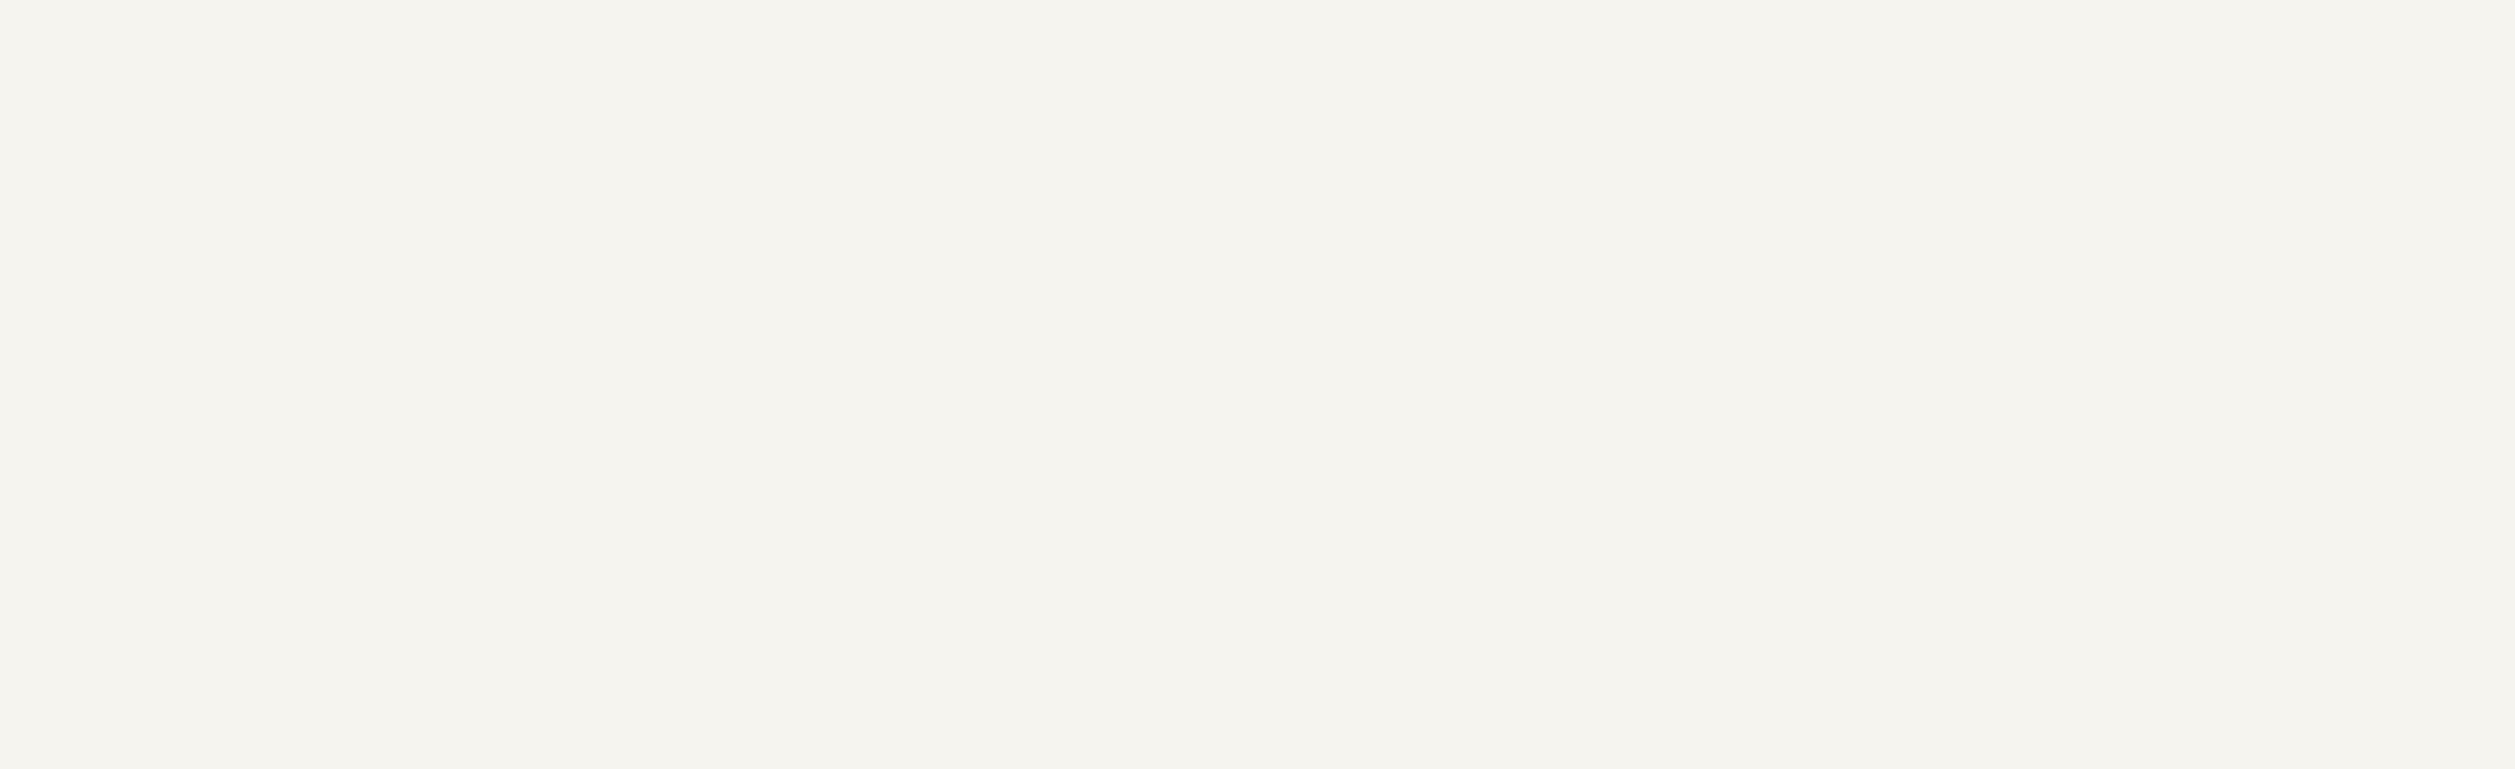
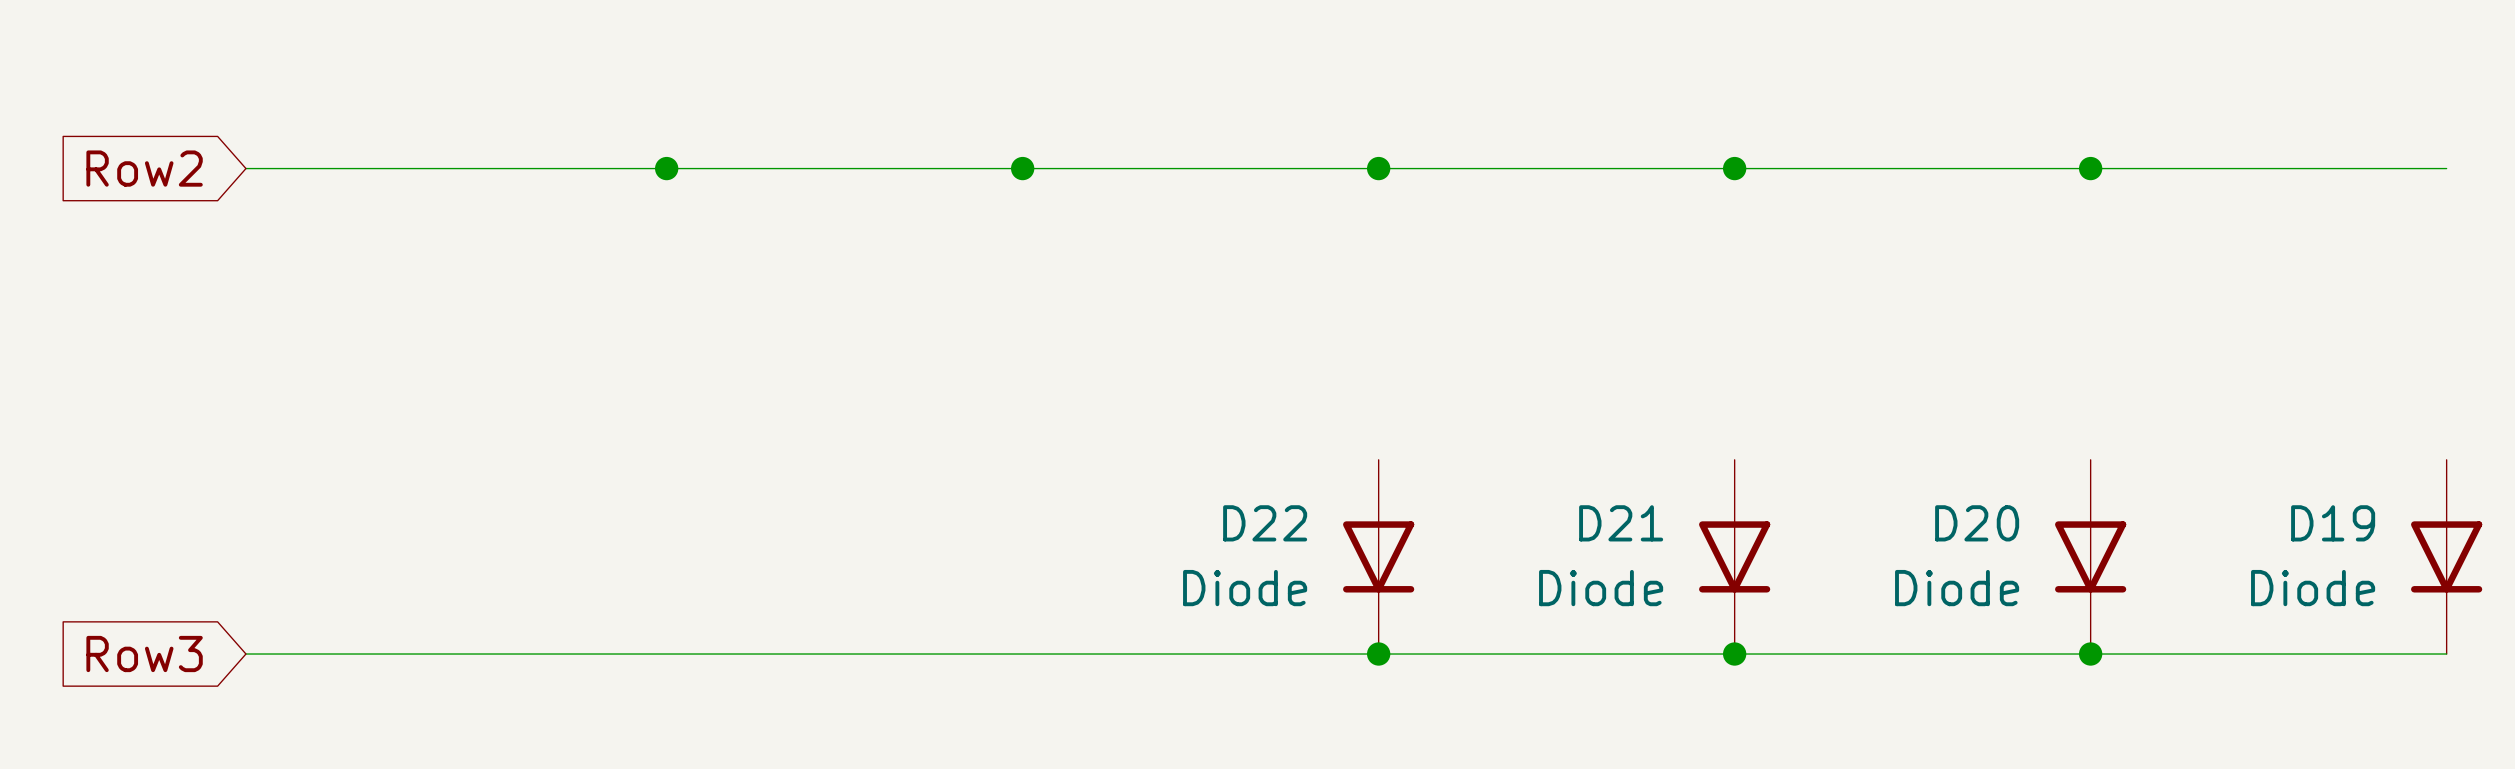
global label: none -> Row2 (144, 168)
wire: none -> (245, 168) (2446, 168)
junction: none -> (666, 168)
junction: none -> (1022, 168)
junction: none -> (1378, 168)
junction: none -> (1734, 168)
junction: none -> (2090, 168)
D22: none -> Diode (1378, 556)
D21: none -> Diode (1734, 556)
D20: none -> Diode (2090, 556)
D19: none -> Diode (2446, 556)
global label: none -> Row3 (144, 654)
wire: none -> (245, 654) (2446, 654)
junction: none -> (1378, 654)
junction: none -> (1734, 654)
junction: none -> (2090, 654)

